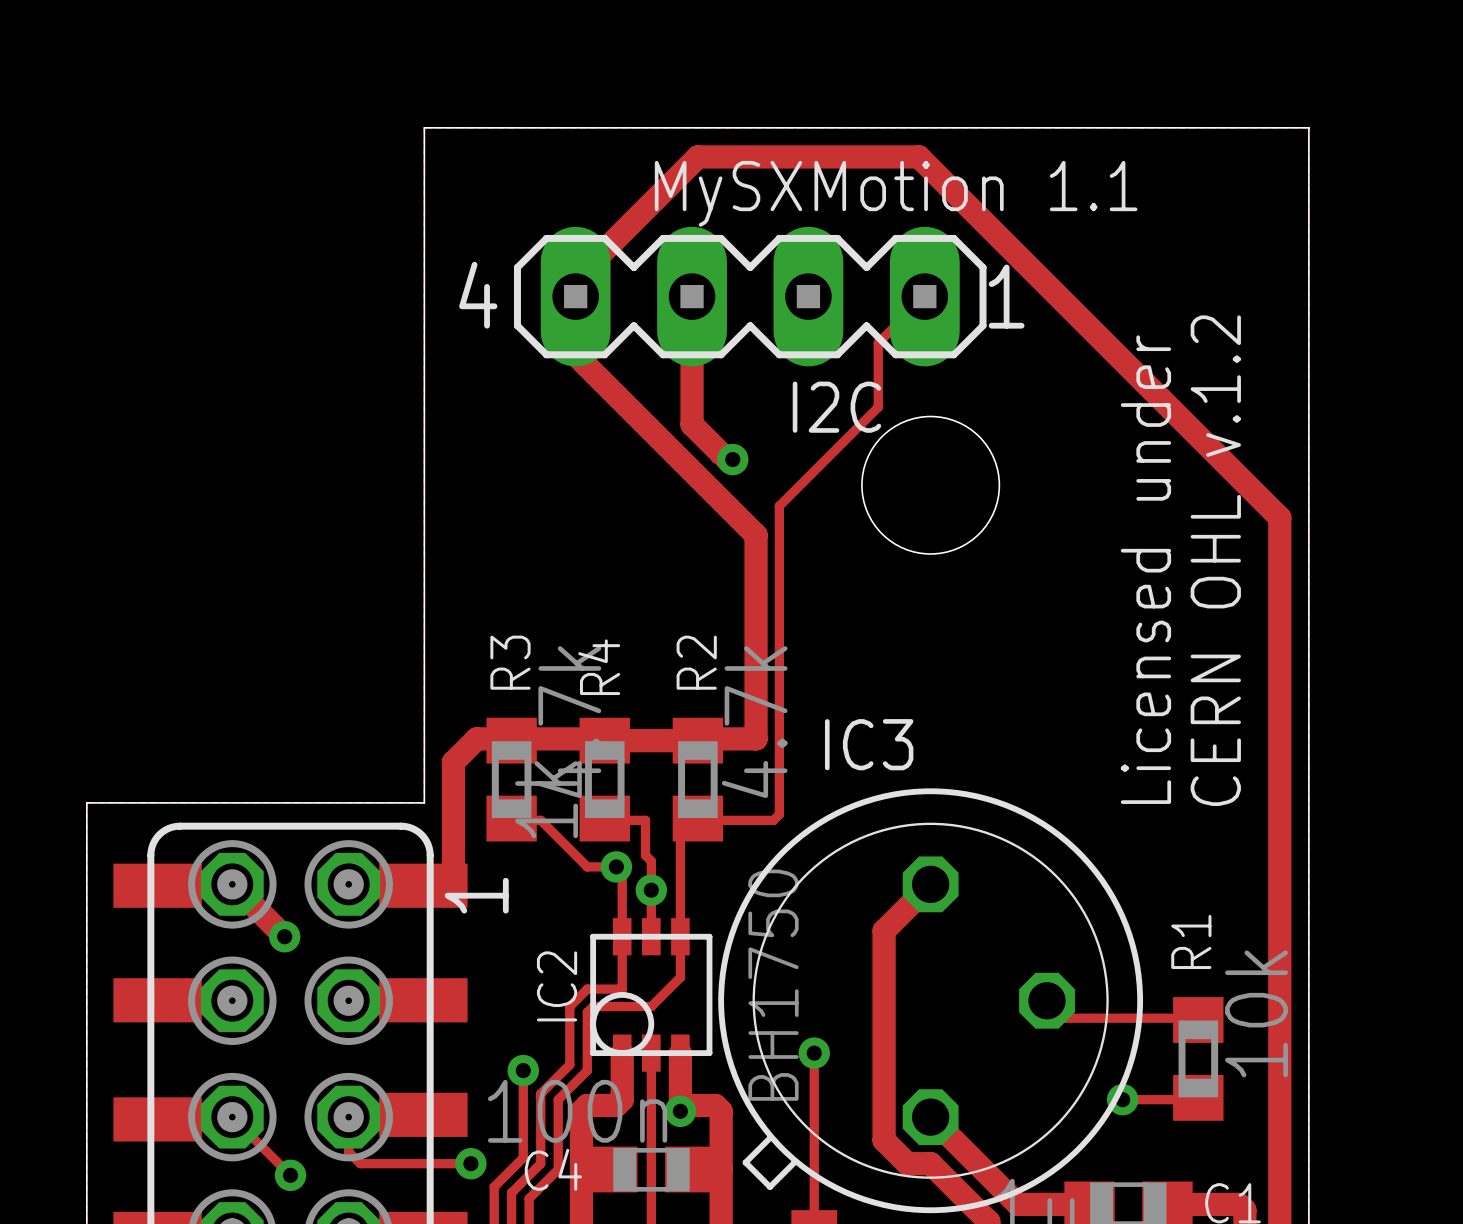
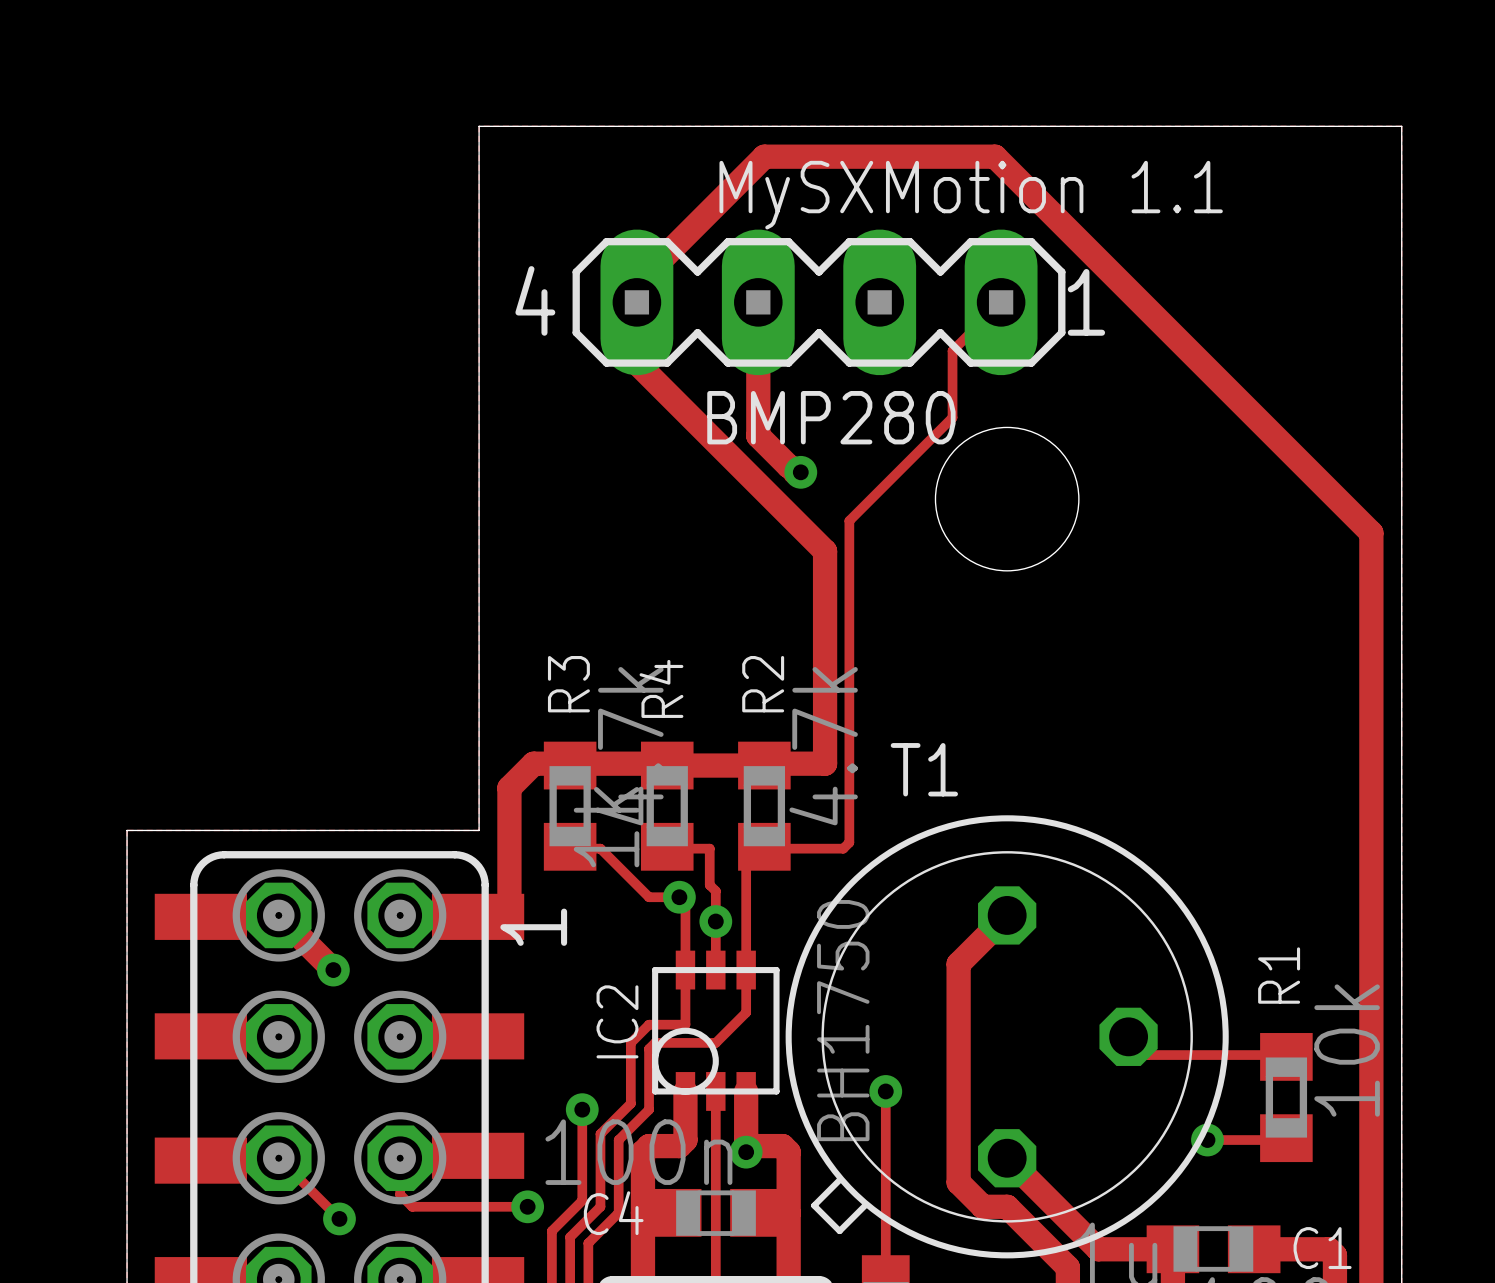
I2C name: I2C (836, 407) -> BMP280 (831, 417)
text: CERN OHL v.1.2 (1215, 560) -> none
text: Licensed under (1145, 569) -> none
IC3 name: IC3 (869, 744) -> T1 (924, 769)

